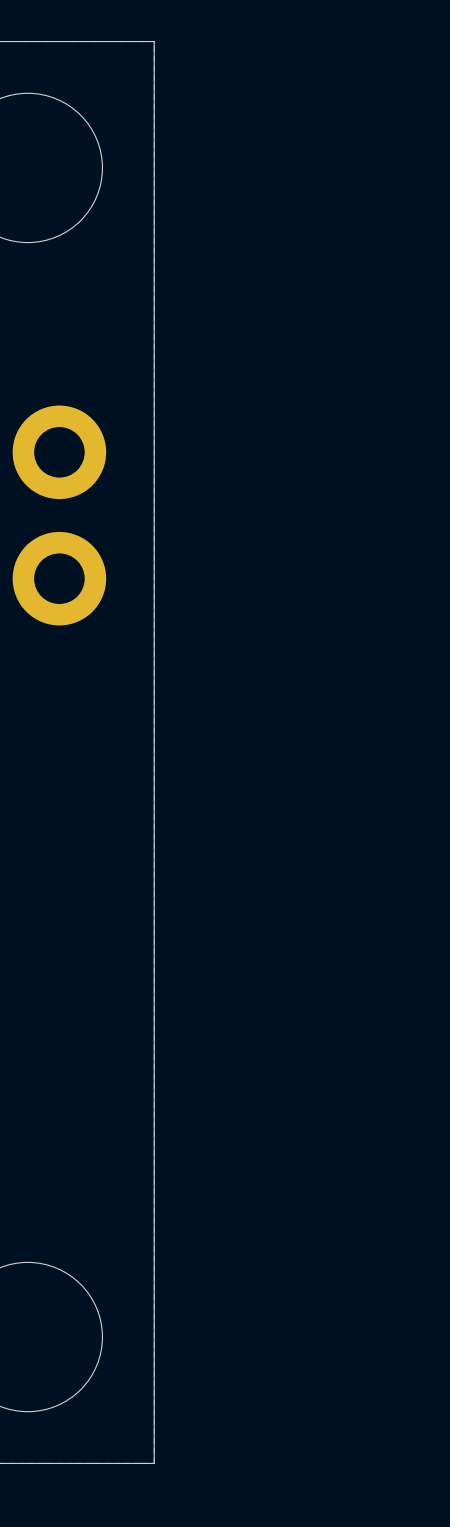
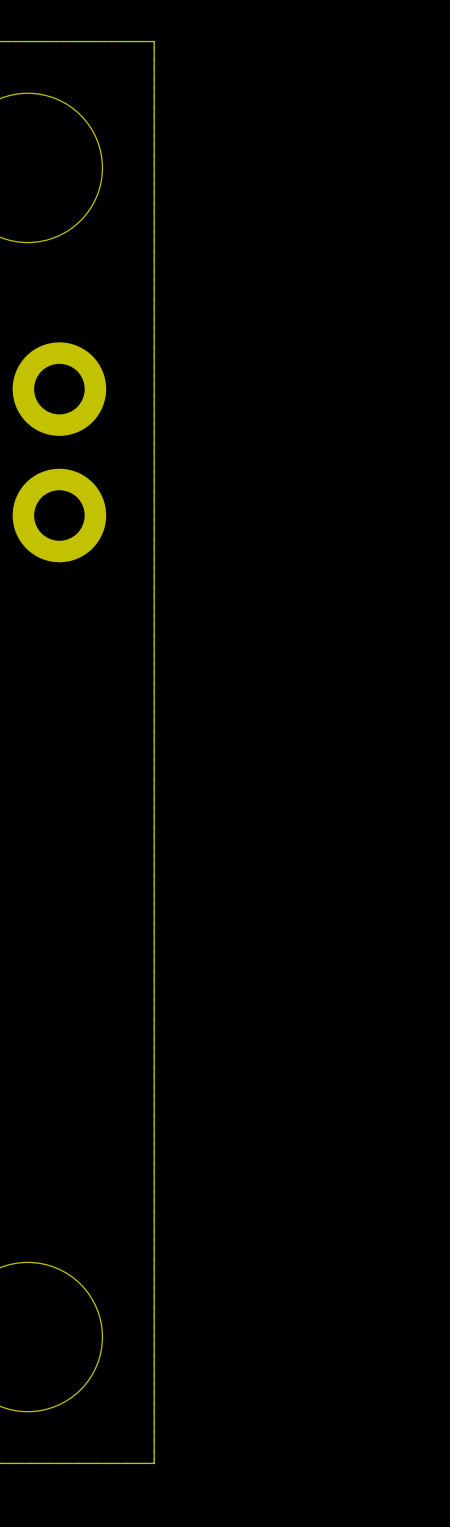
part position: (59, 515) -> (59, 452)

